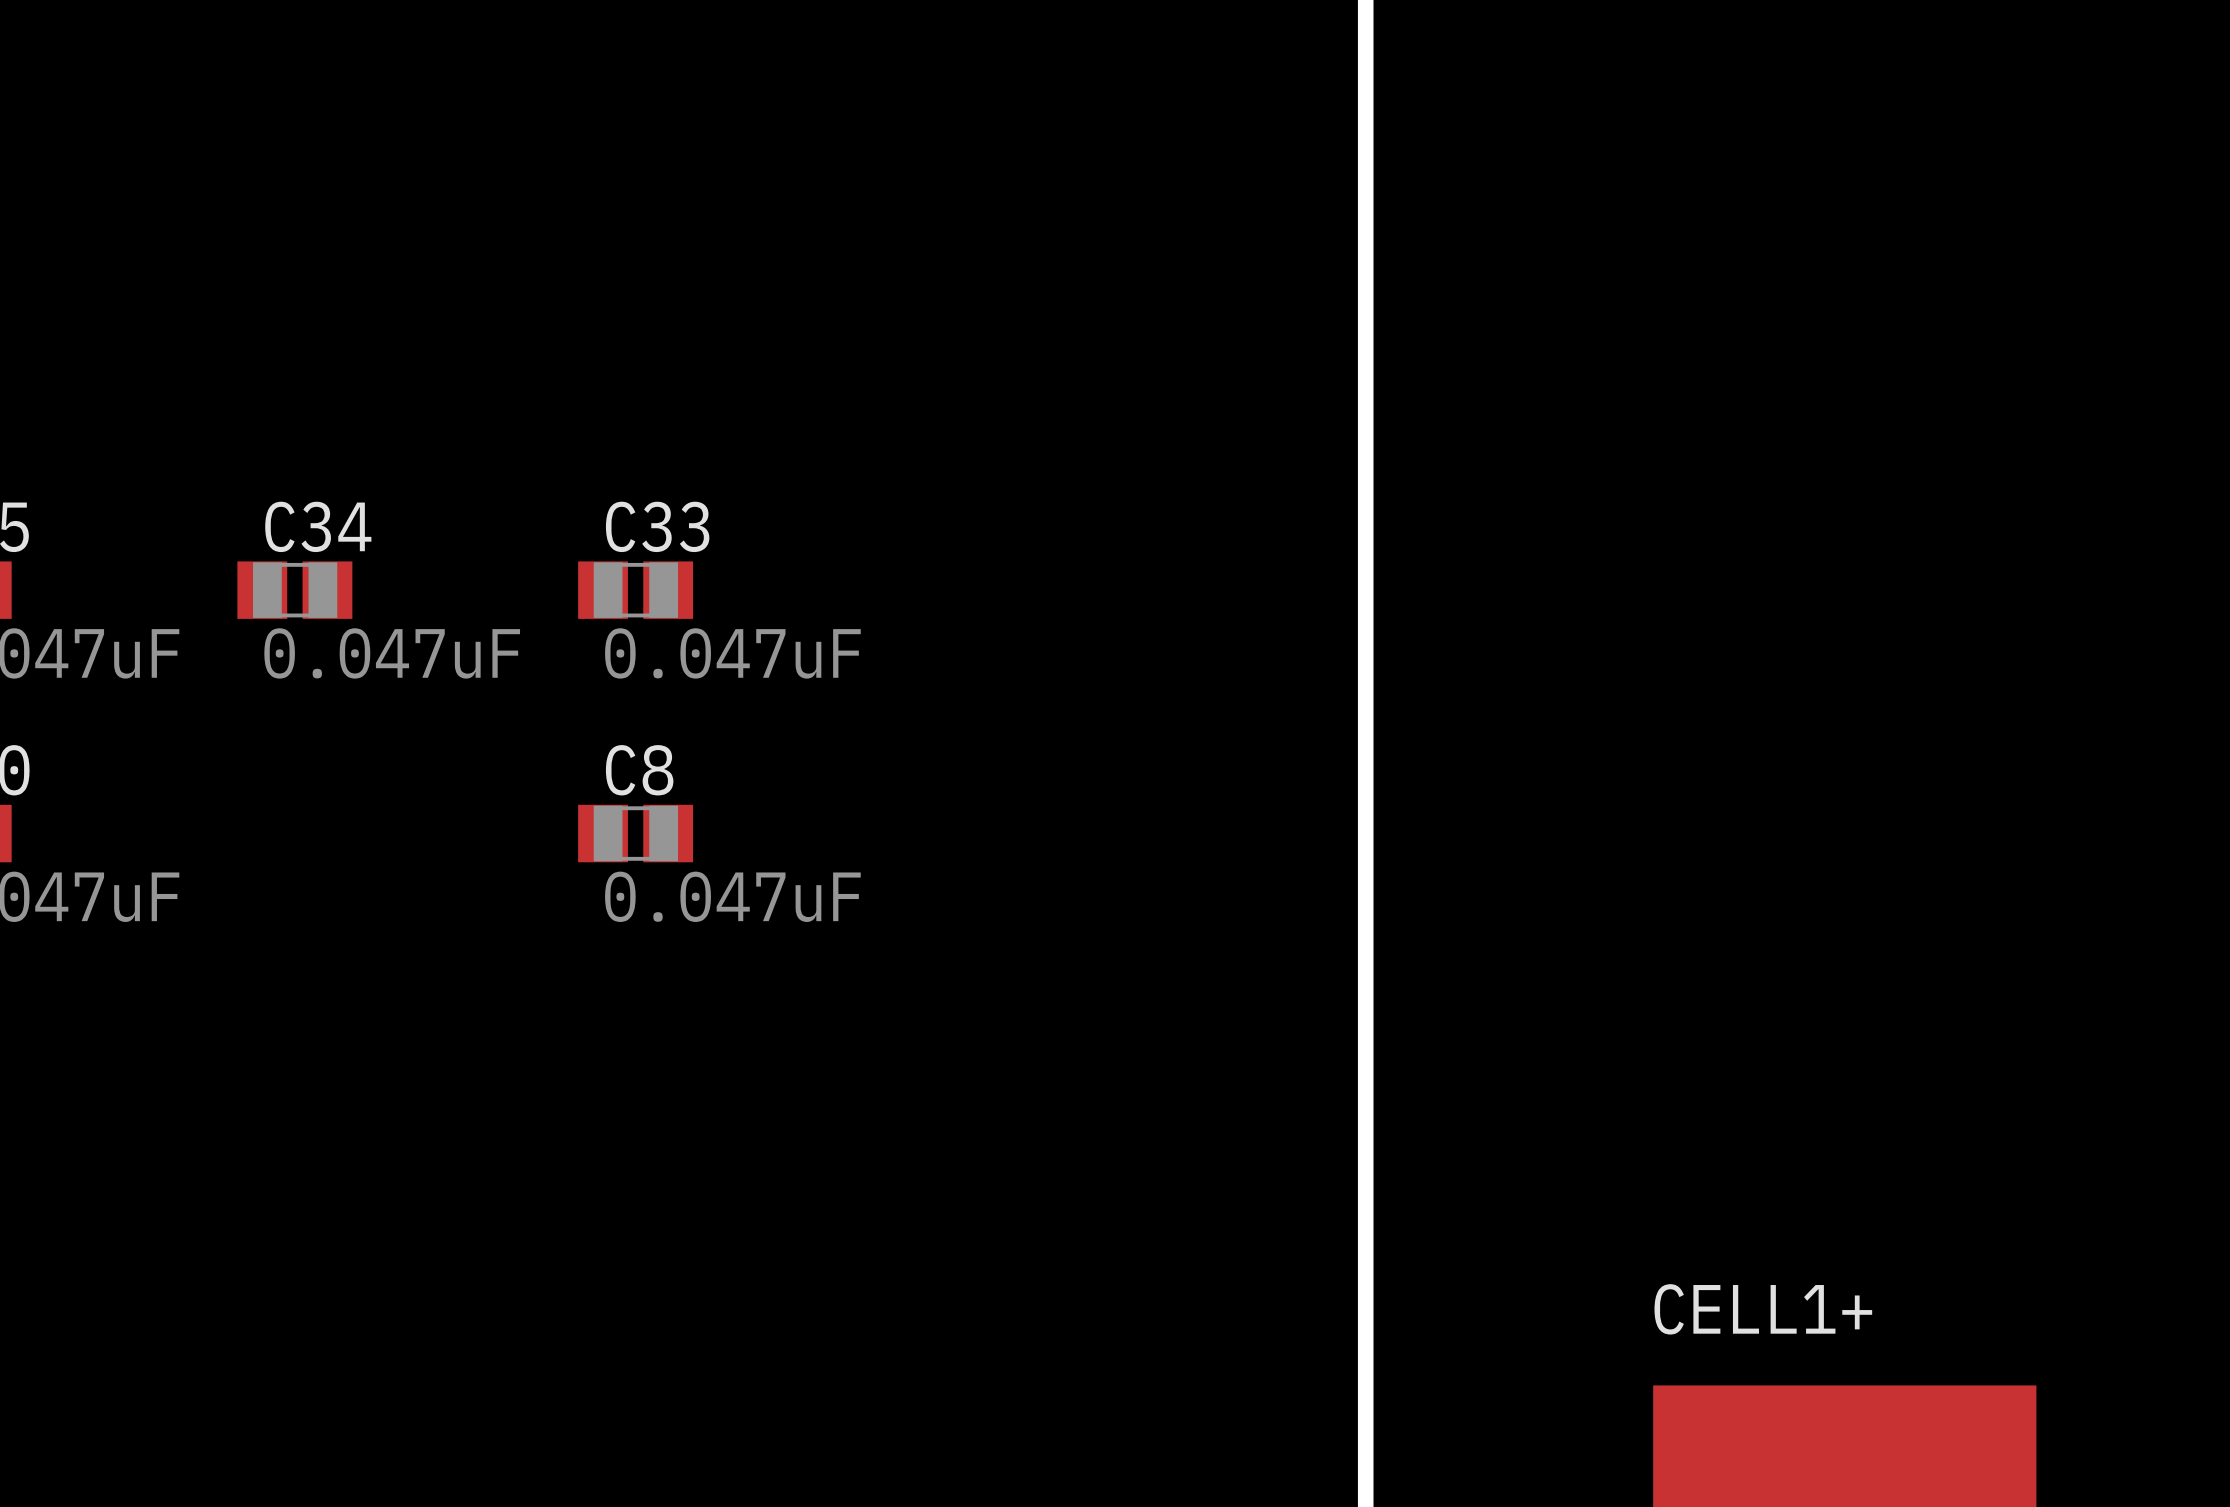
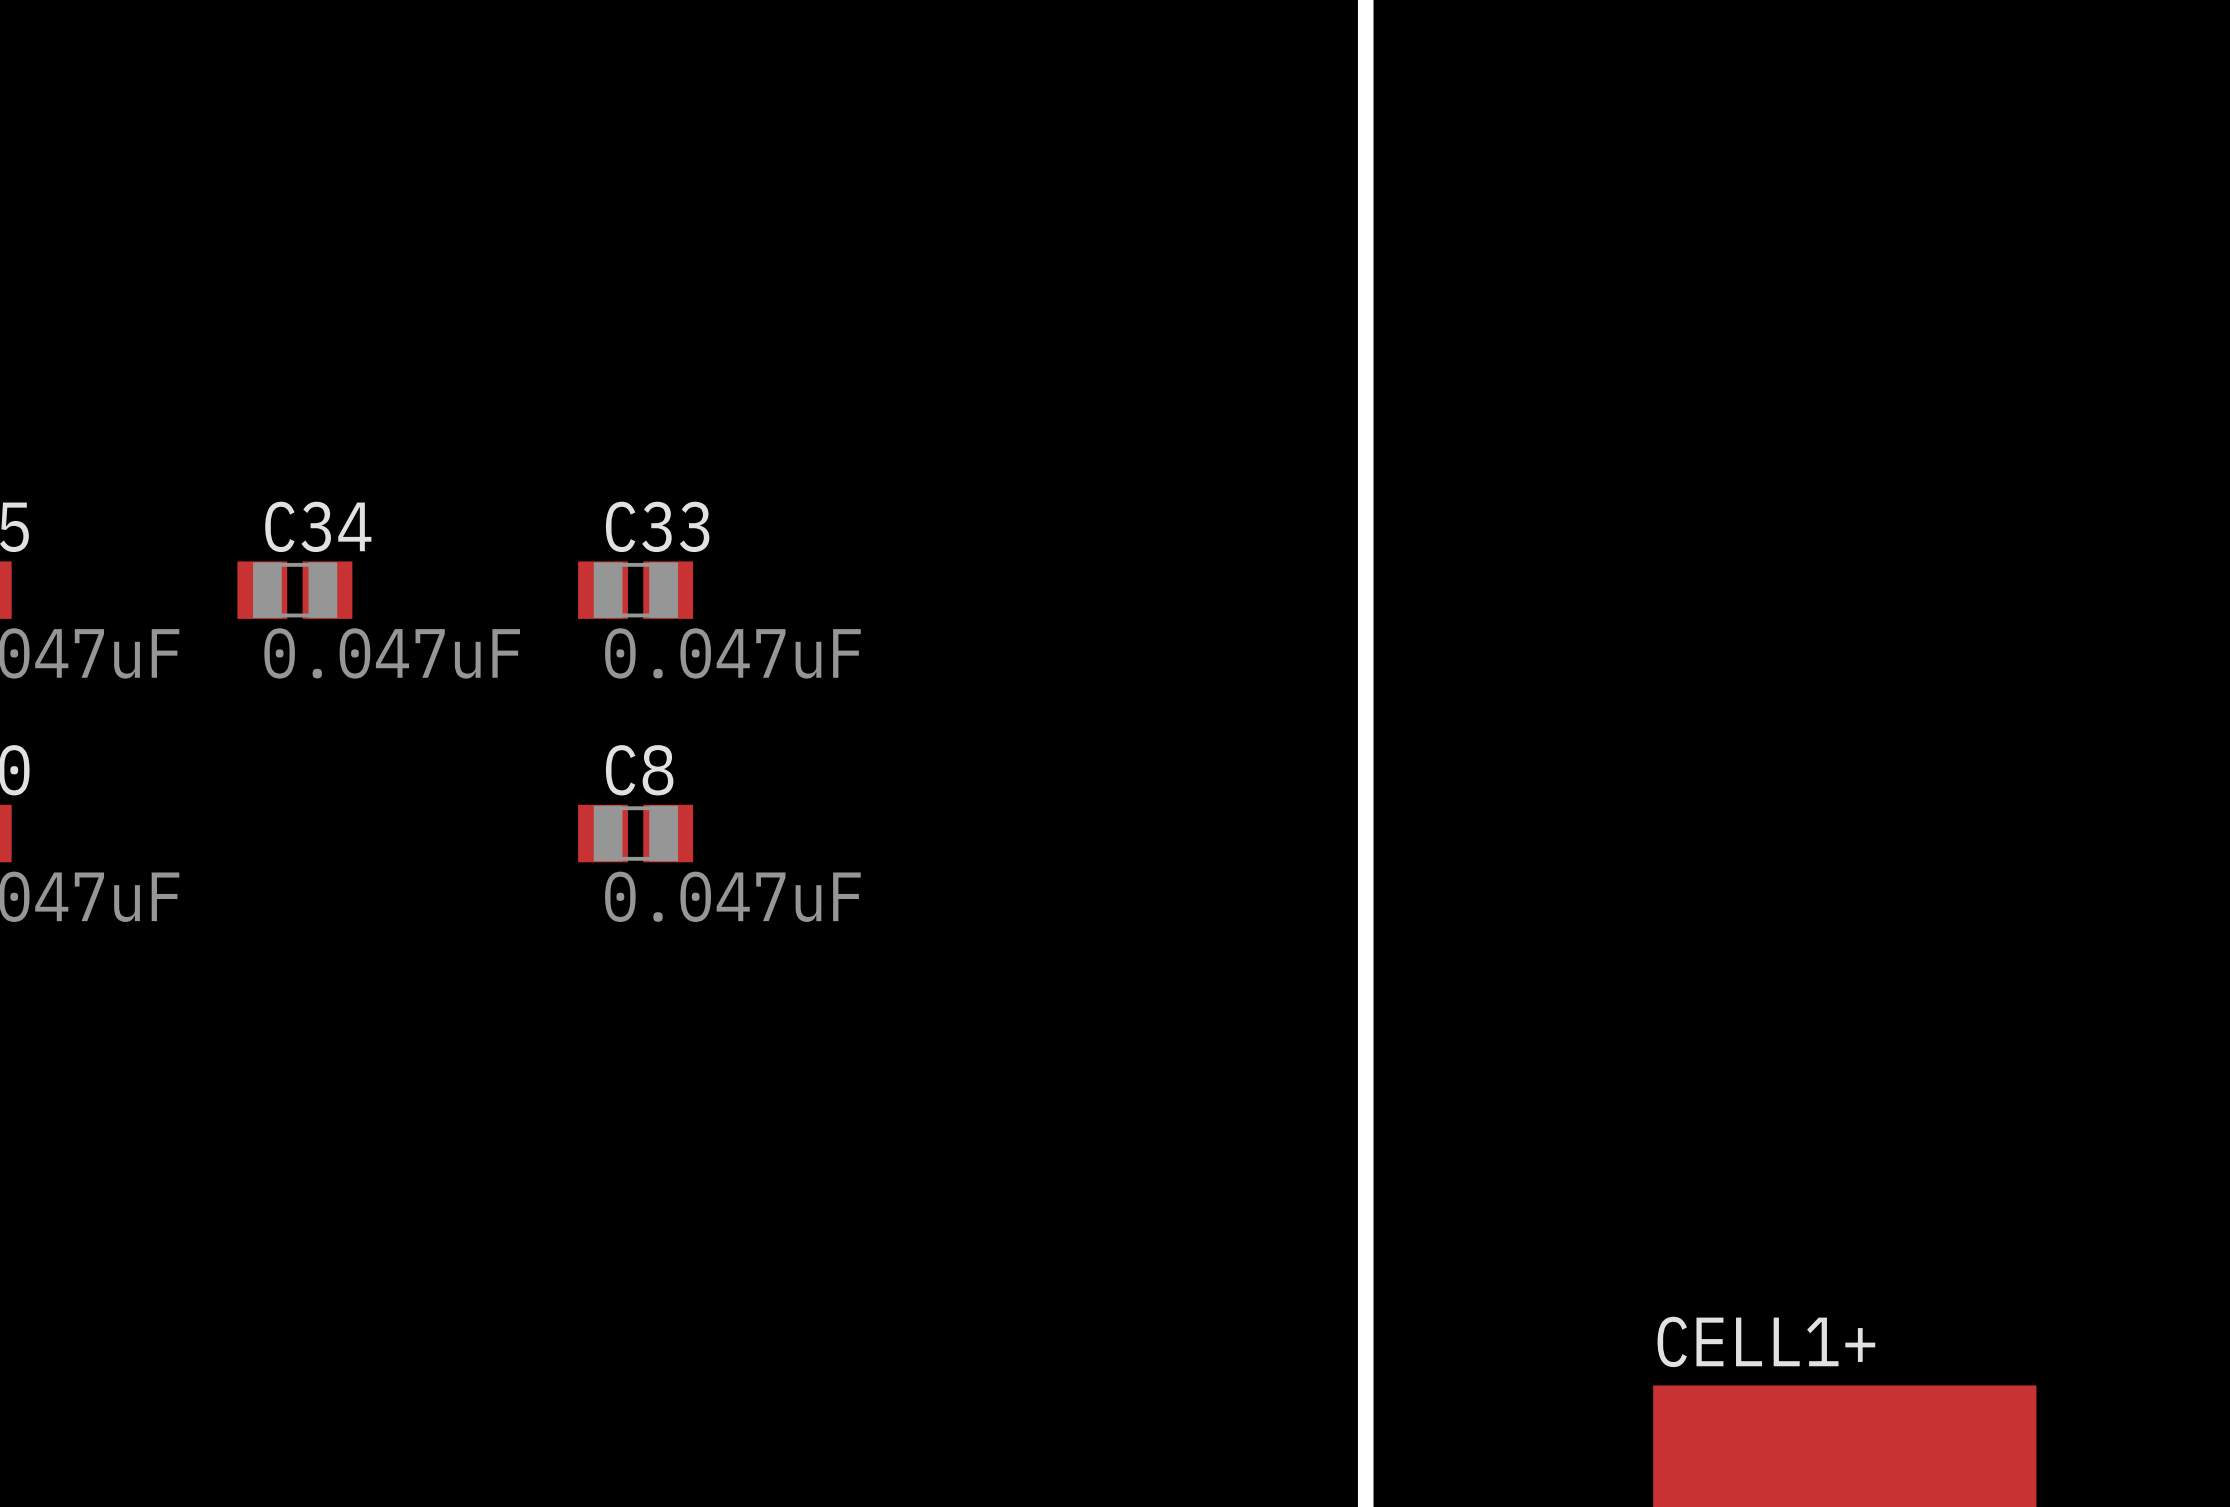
CELL1+ name position: CELL1+ (1763, 1309) -> CELL1+ (1766, 1341)

